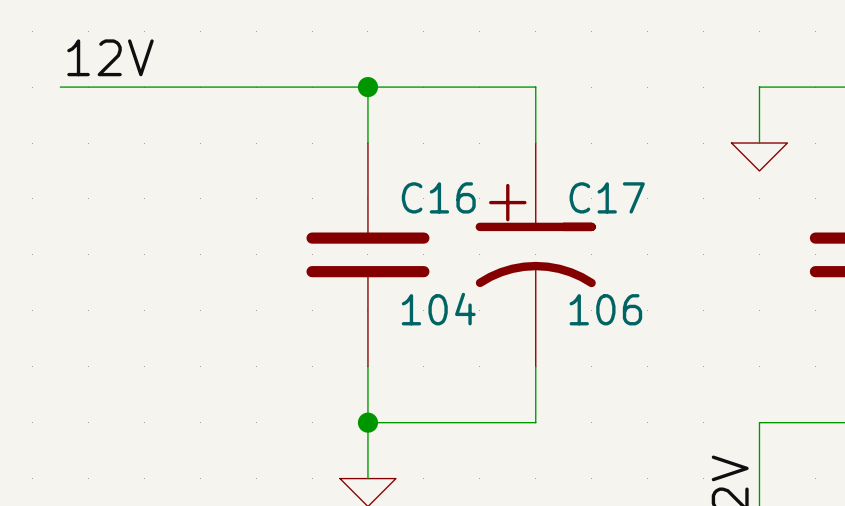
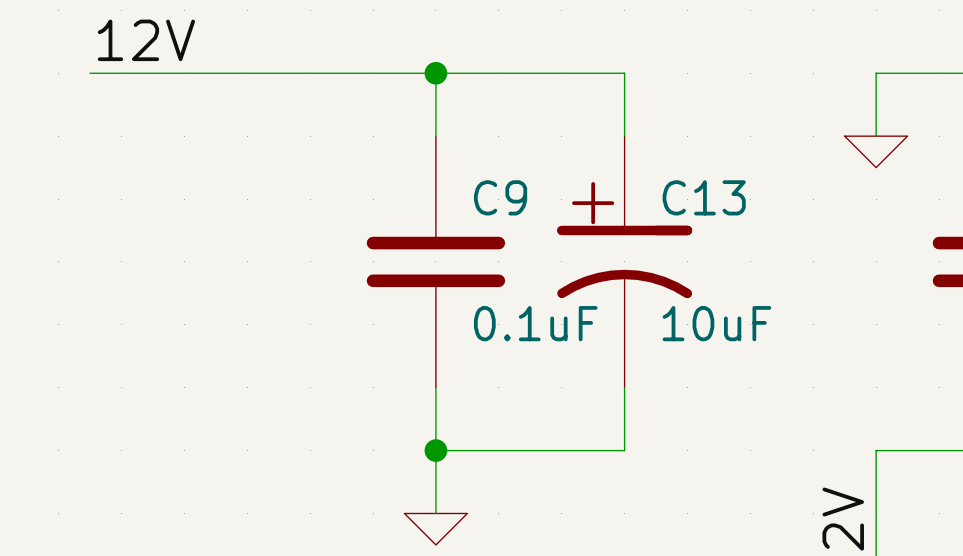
C16 name: C16 (438, 197) -> C9 (500, 197)
C17 name: C17 (607, 197) -> C13 (704, 197)
C16 value: 104 (438, 309) -> 0.1uF (535, 323)
C17 value: 106 (605, 309) -> 10uF (716, 323)

